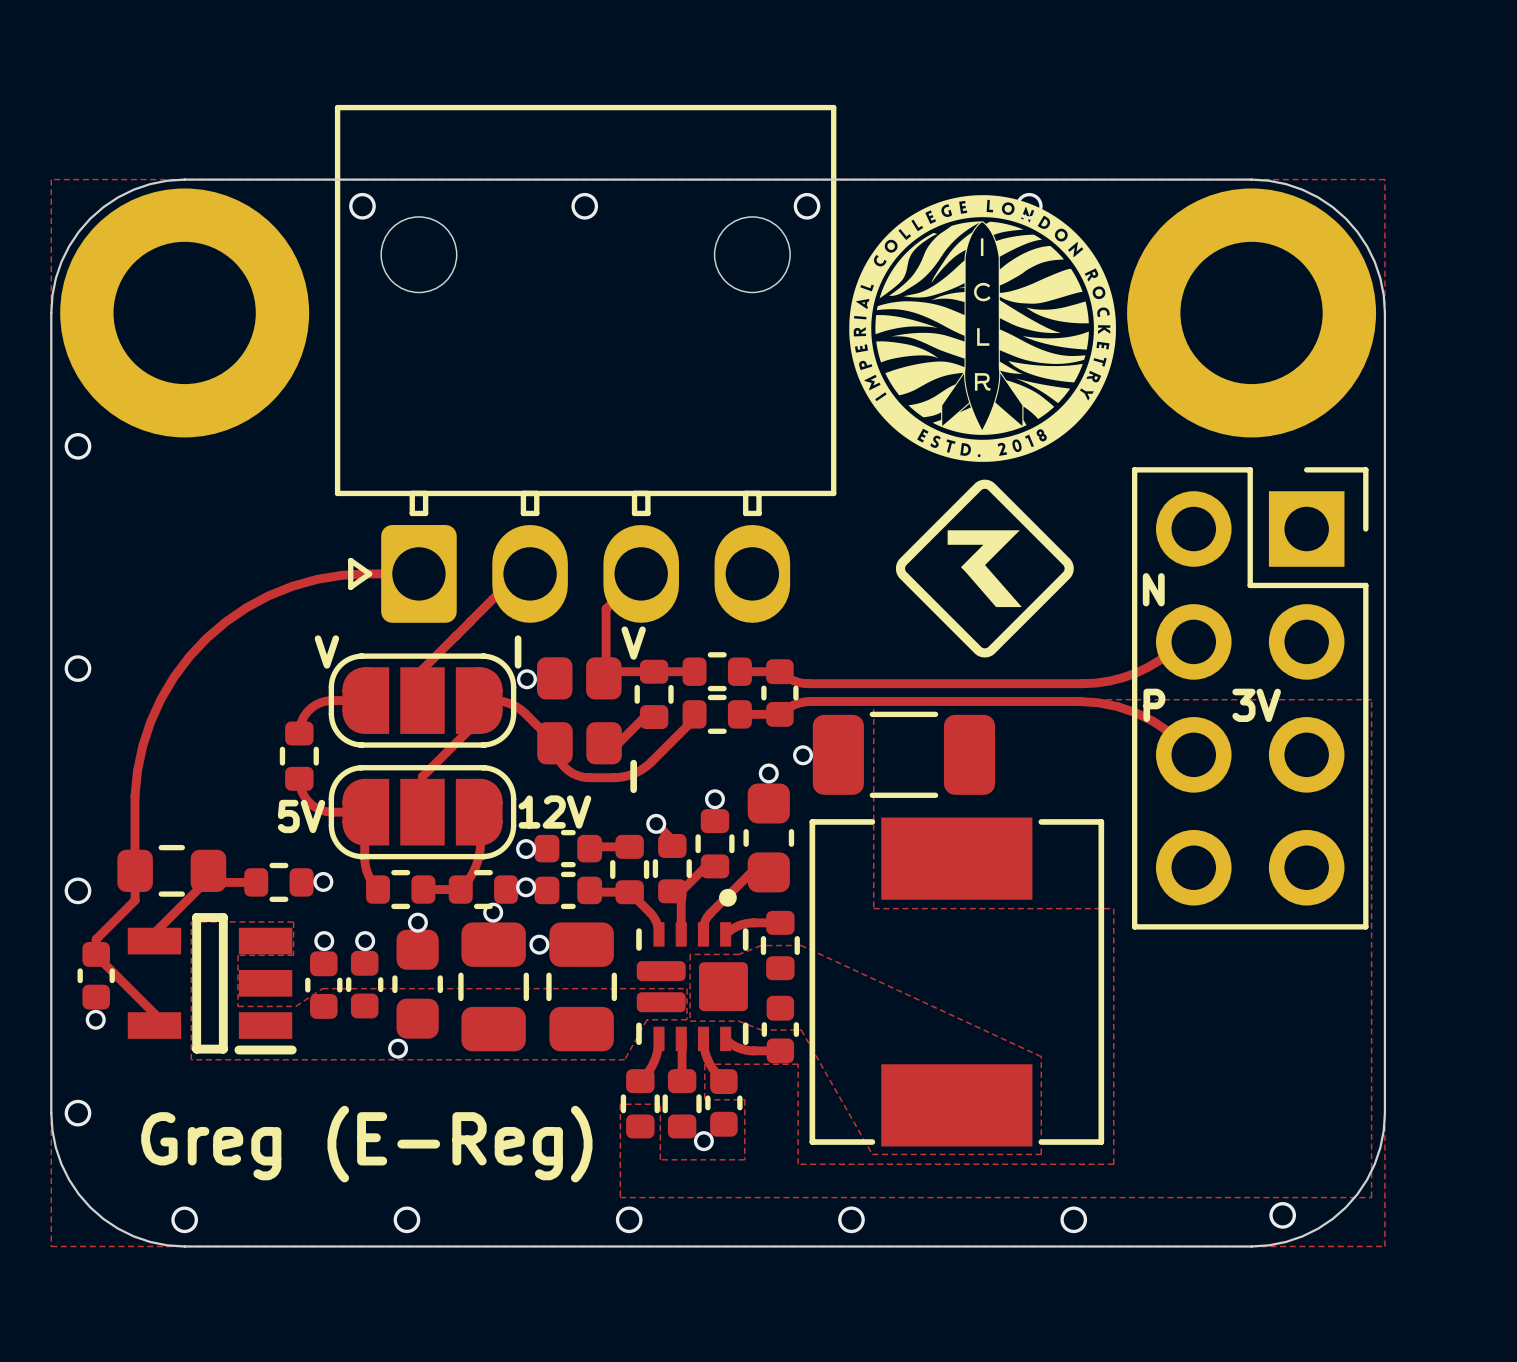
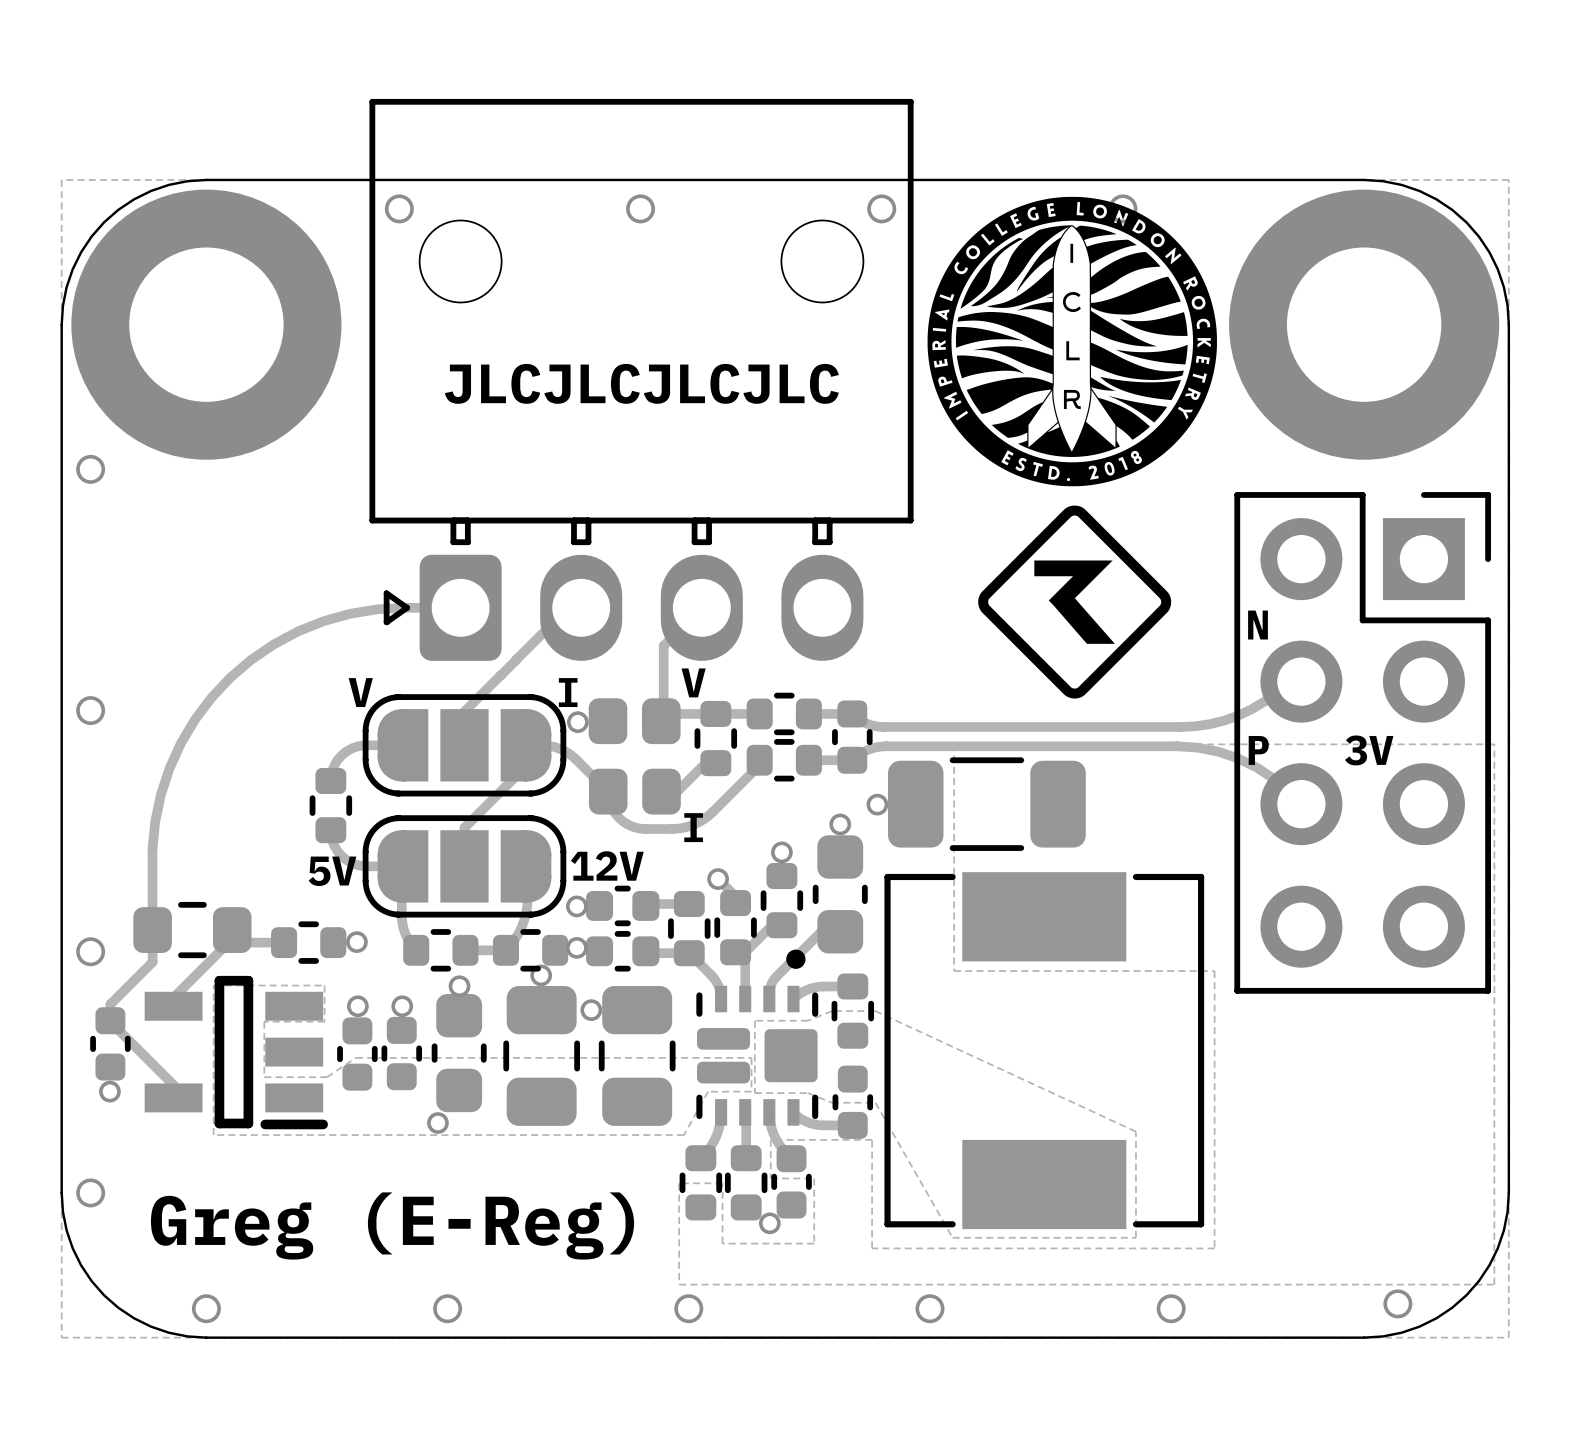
text: none -> JLCJLCJLCJLC (641, 383)

